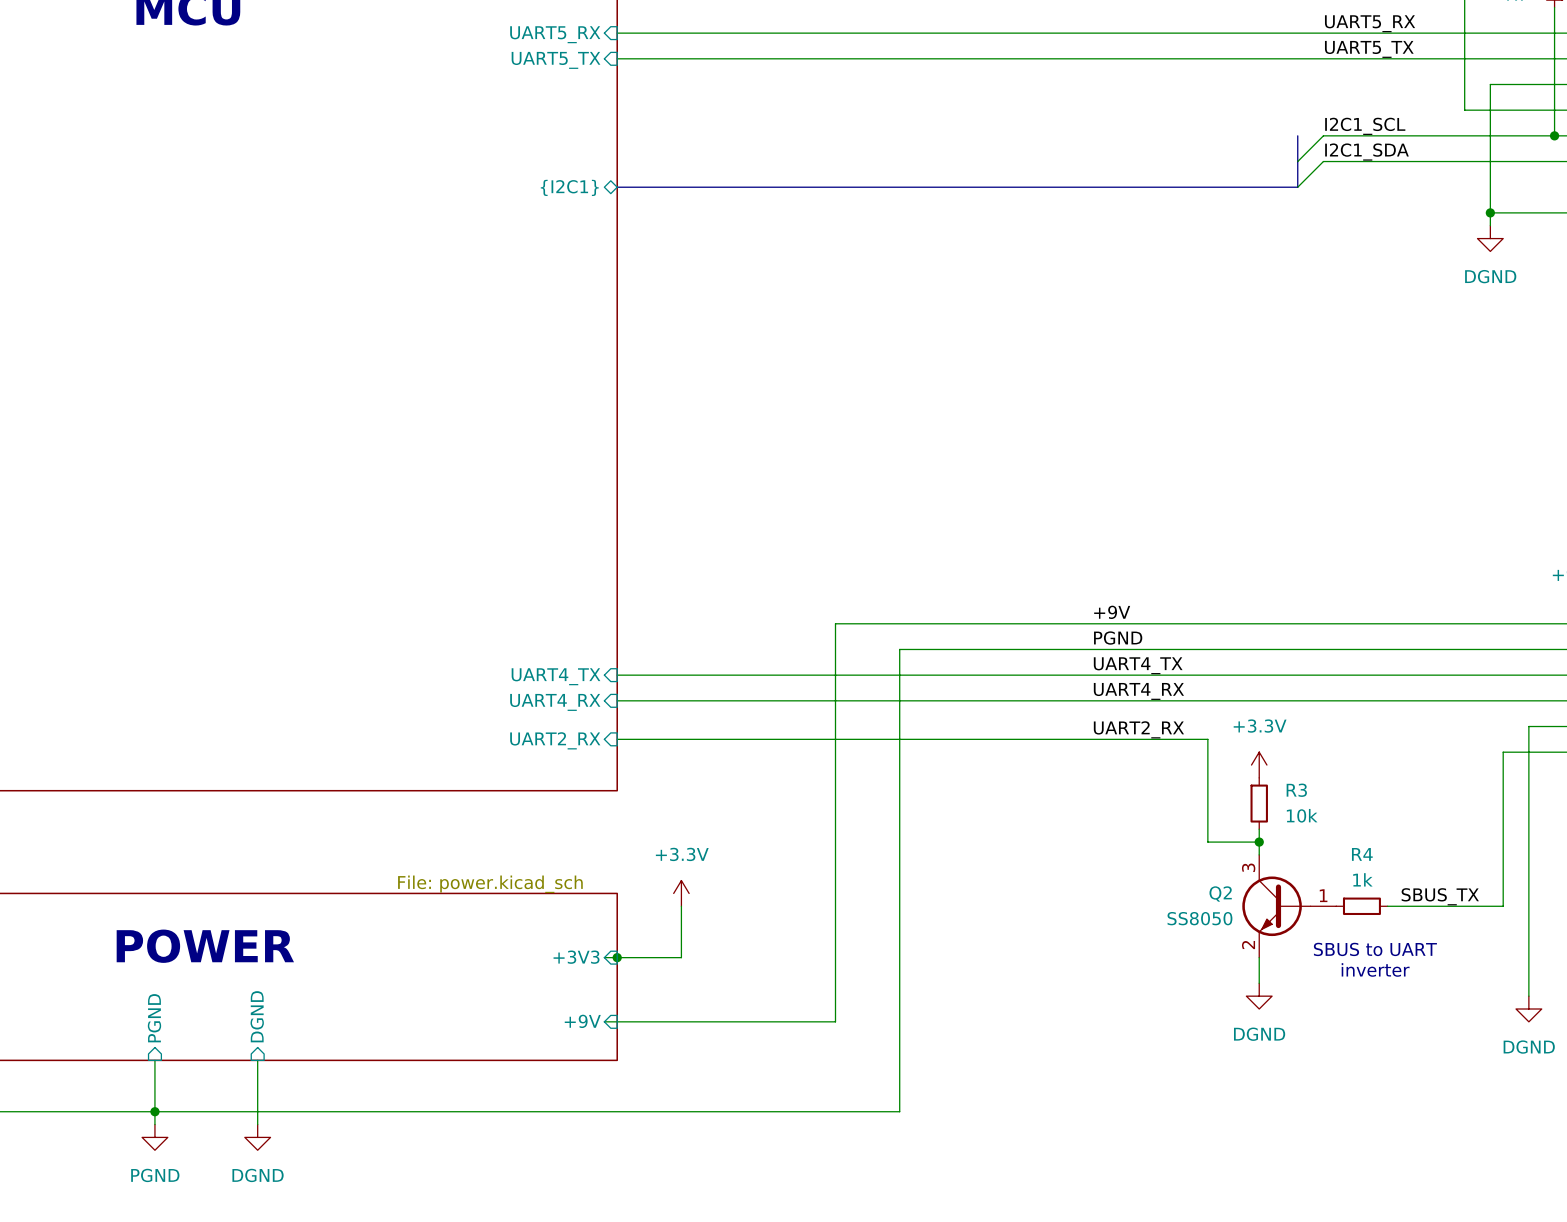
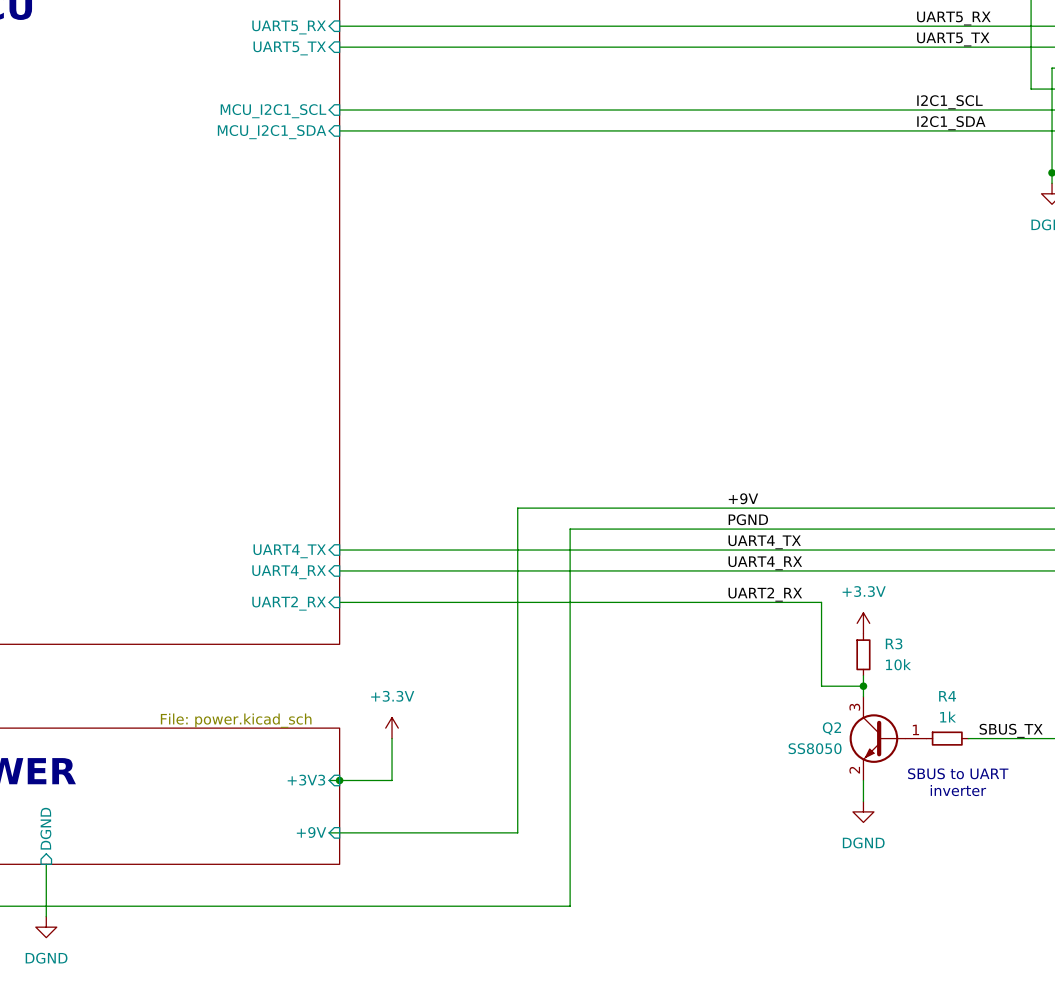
bus: (1297, 135) (1297, 187) (617, 187) -> none
wire: (1323, 135) (1297, 161) -> (915, 110) (339, 110)
sheet pin: none -> MCU_I2C1_SCL (273, 111)
wire: (1323, 161) (1297, 187) -> (915, 130) (339, 130)
sheet pin: none -> MCU_I2C1_SDA (272, 132)
sheet pin: {I2C1} (569, 187) -> none

